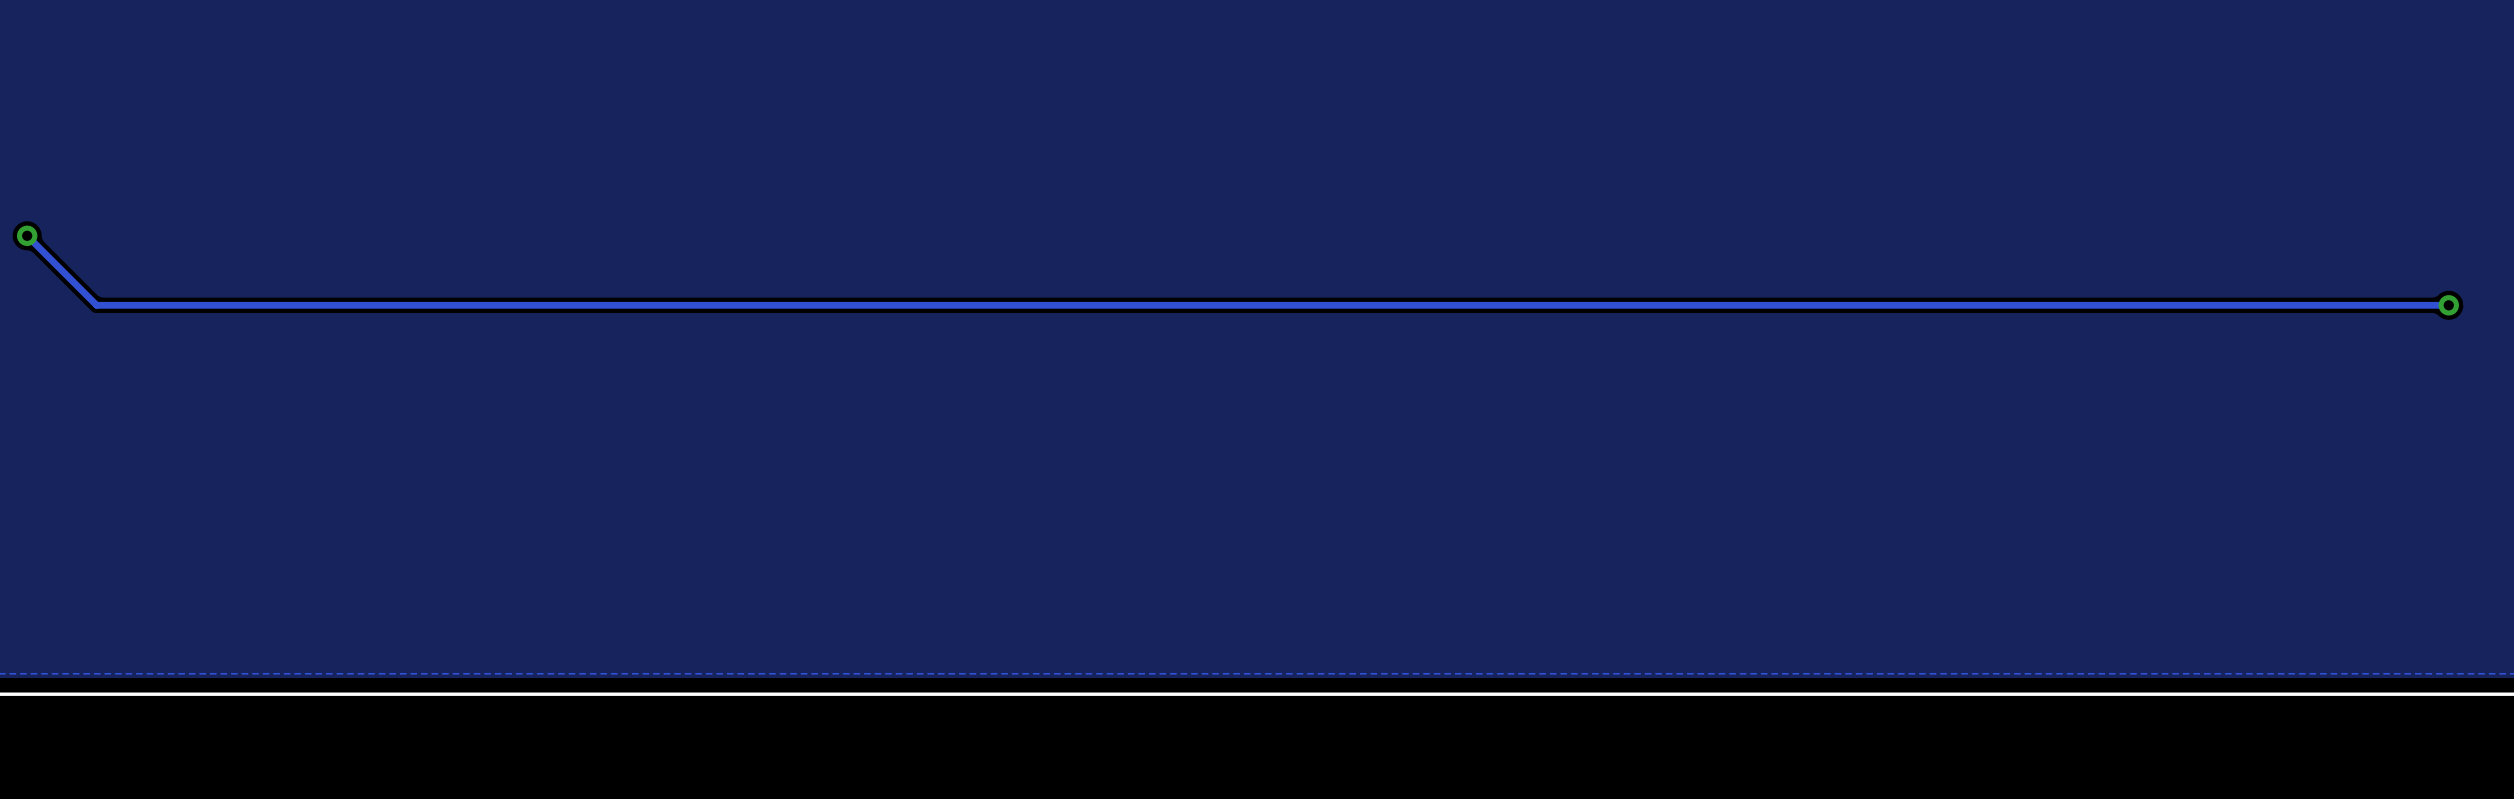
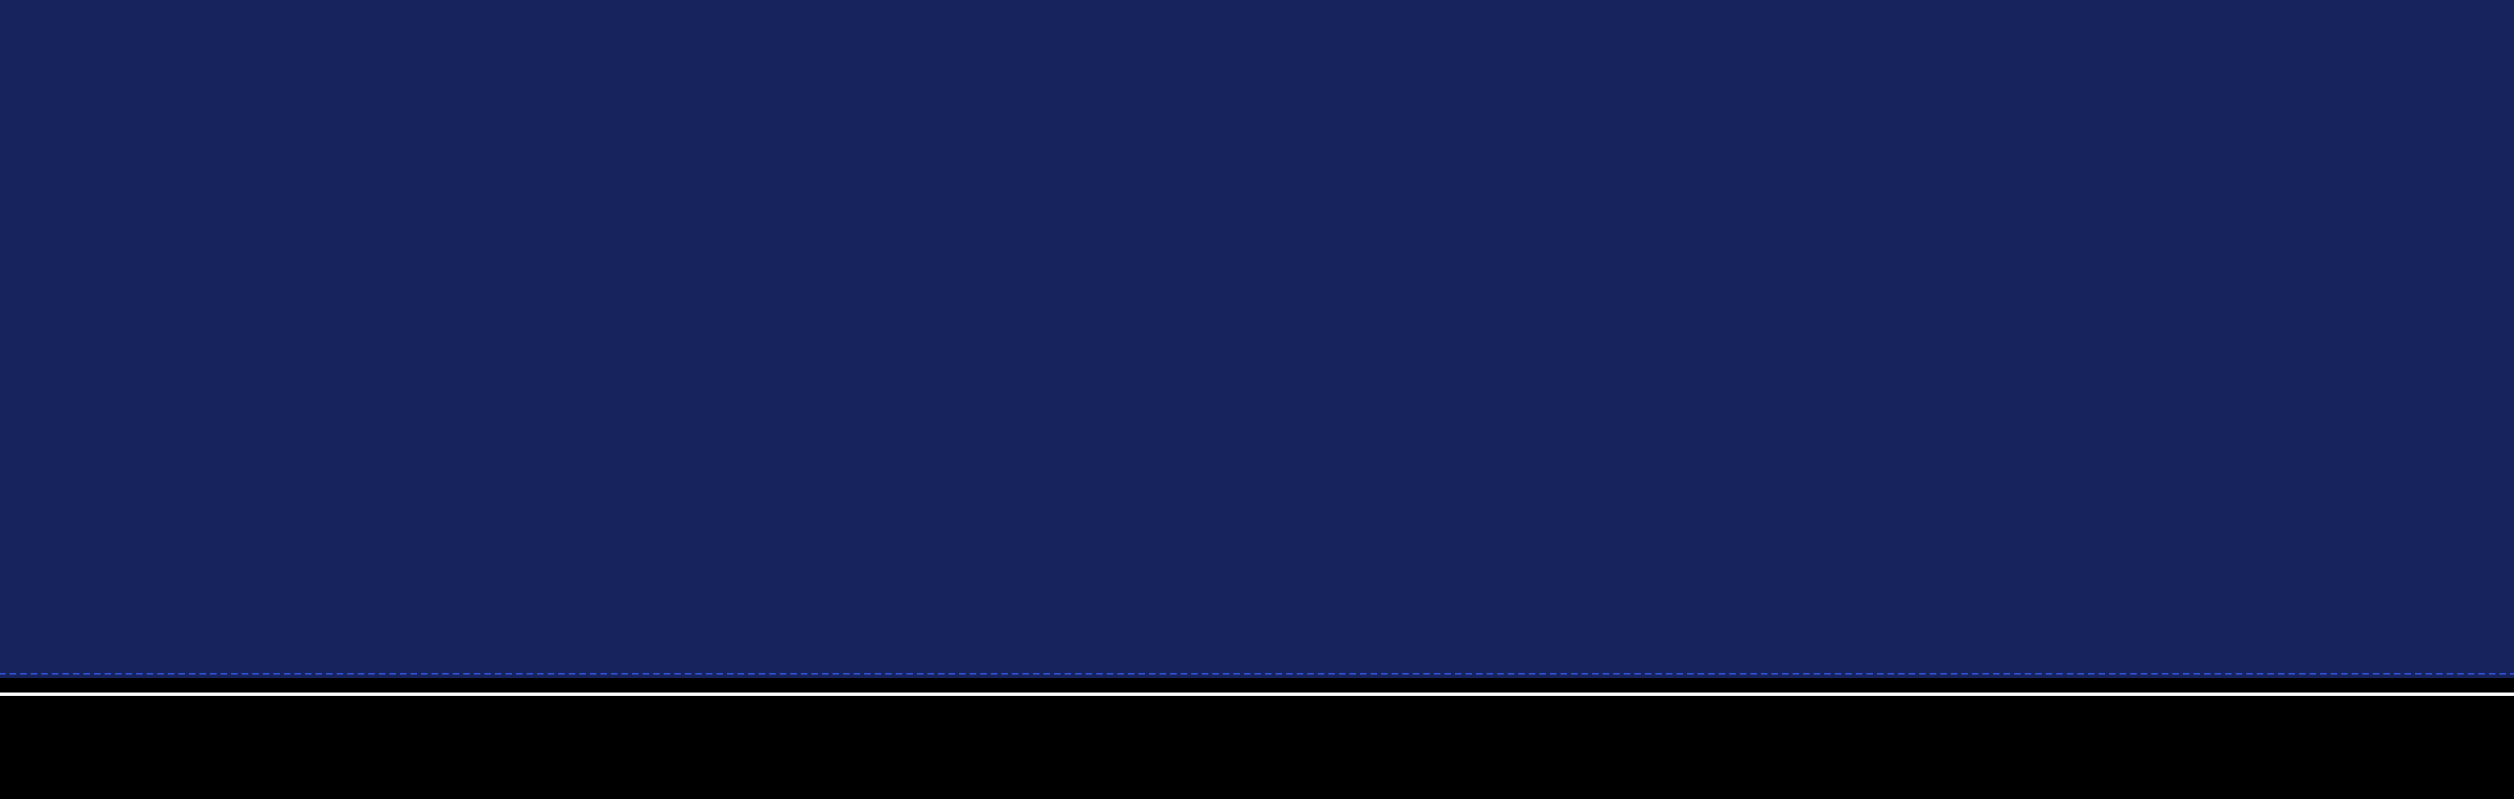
track: (27, 235) (96, 305) (2448, 305) -> none
via: (27, 235) -> none
via: (2448, 305) -> none

